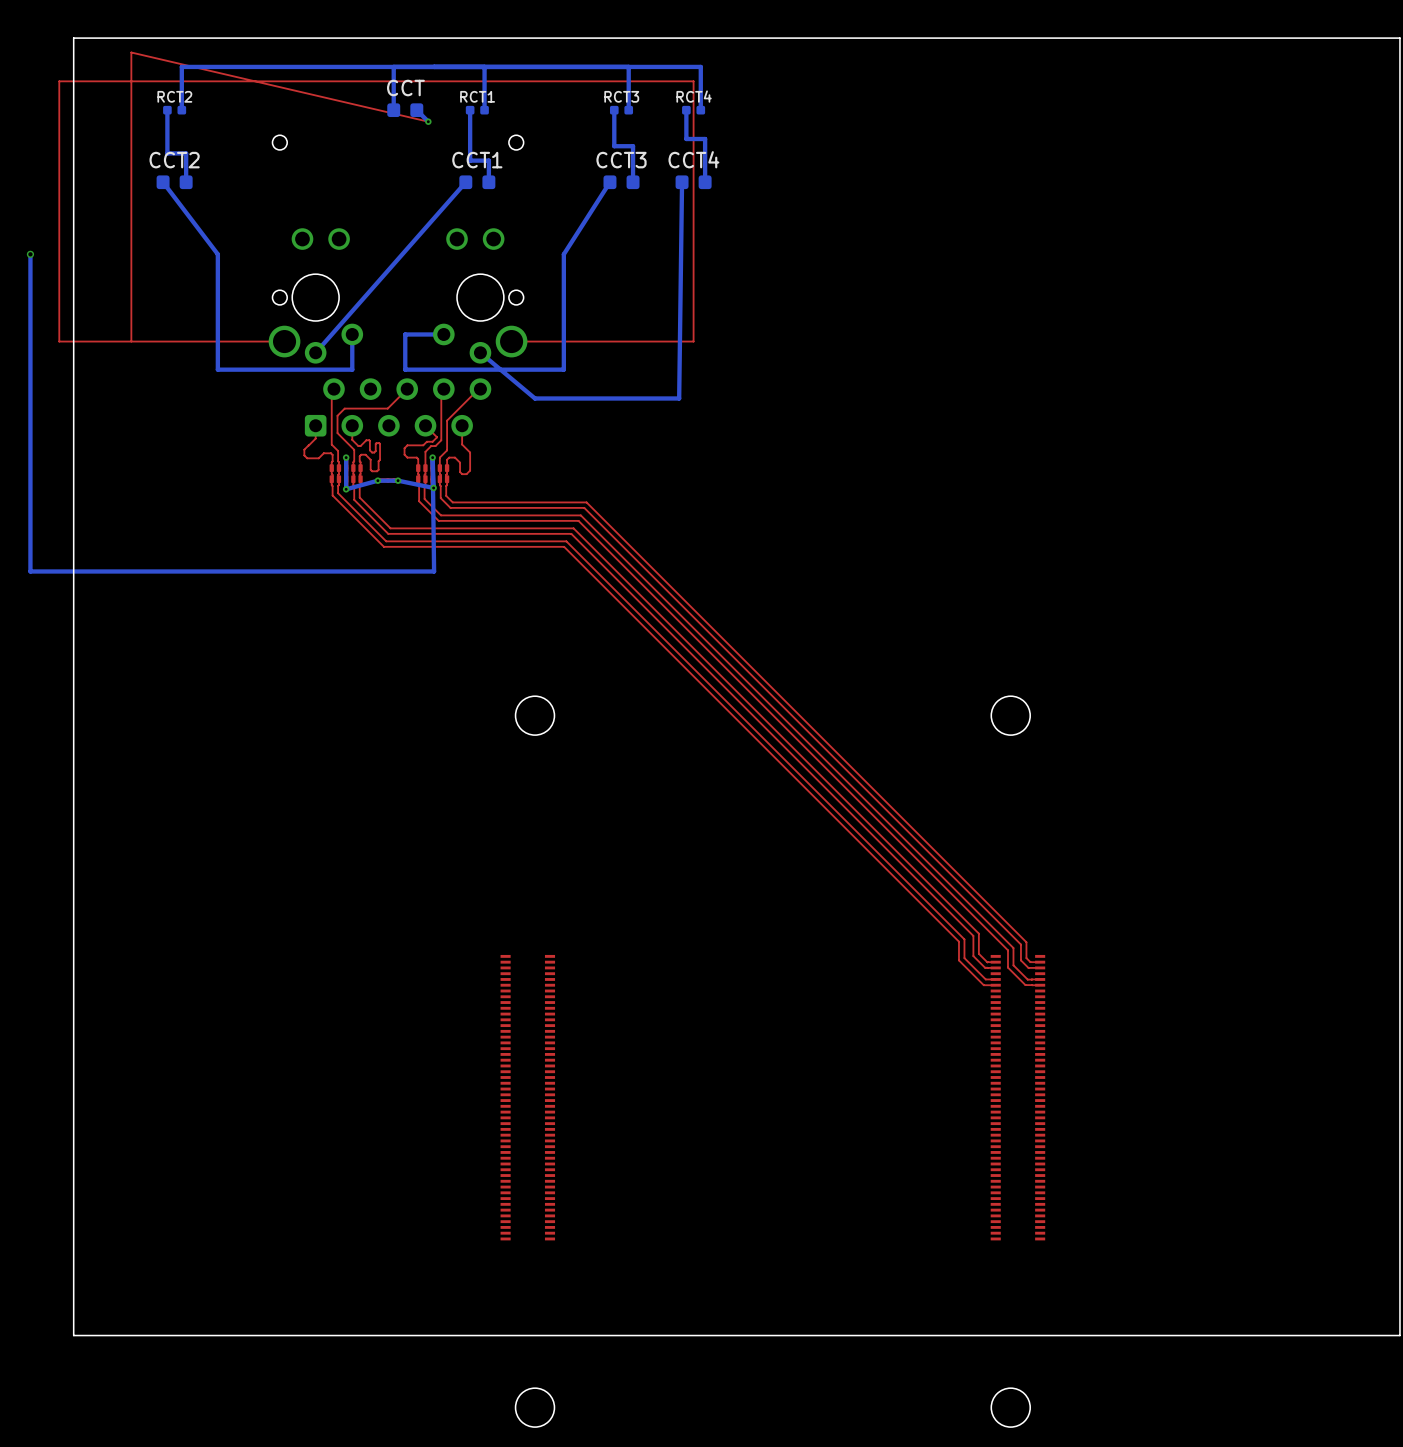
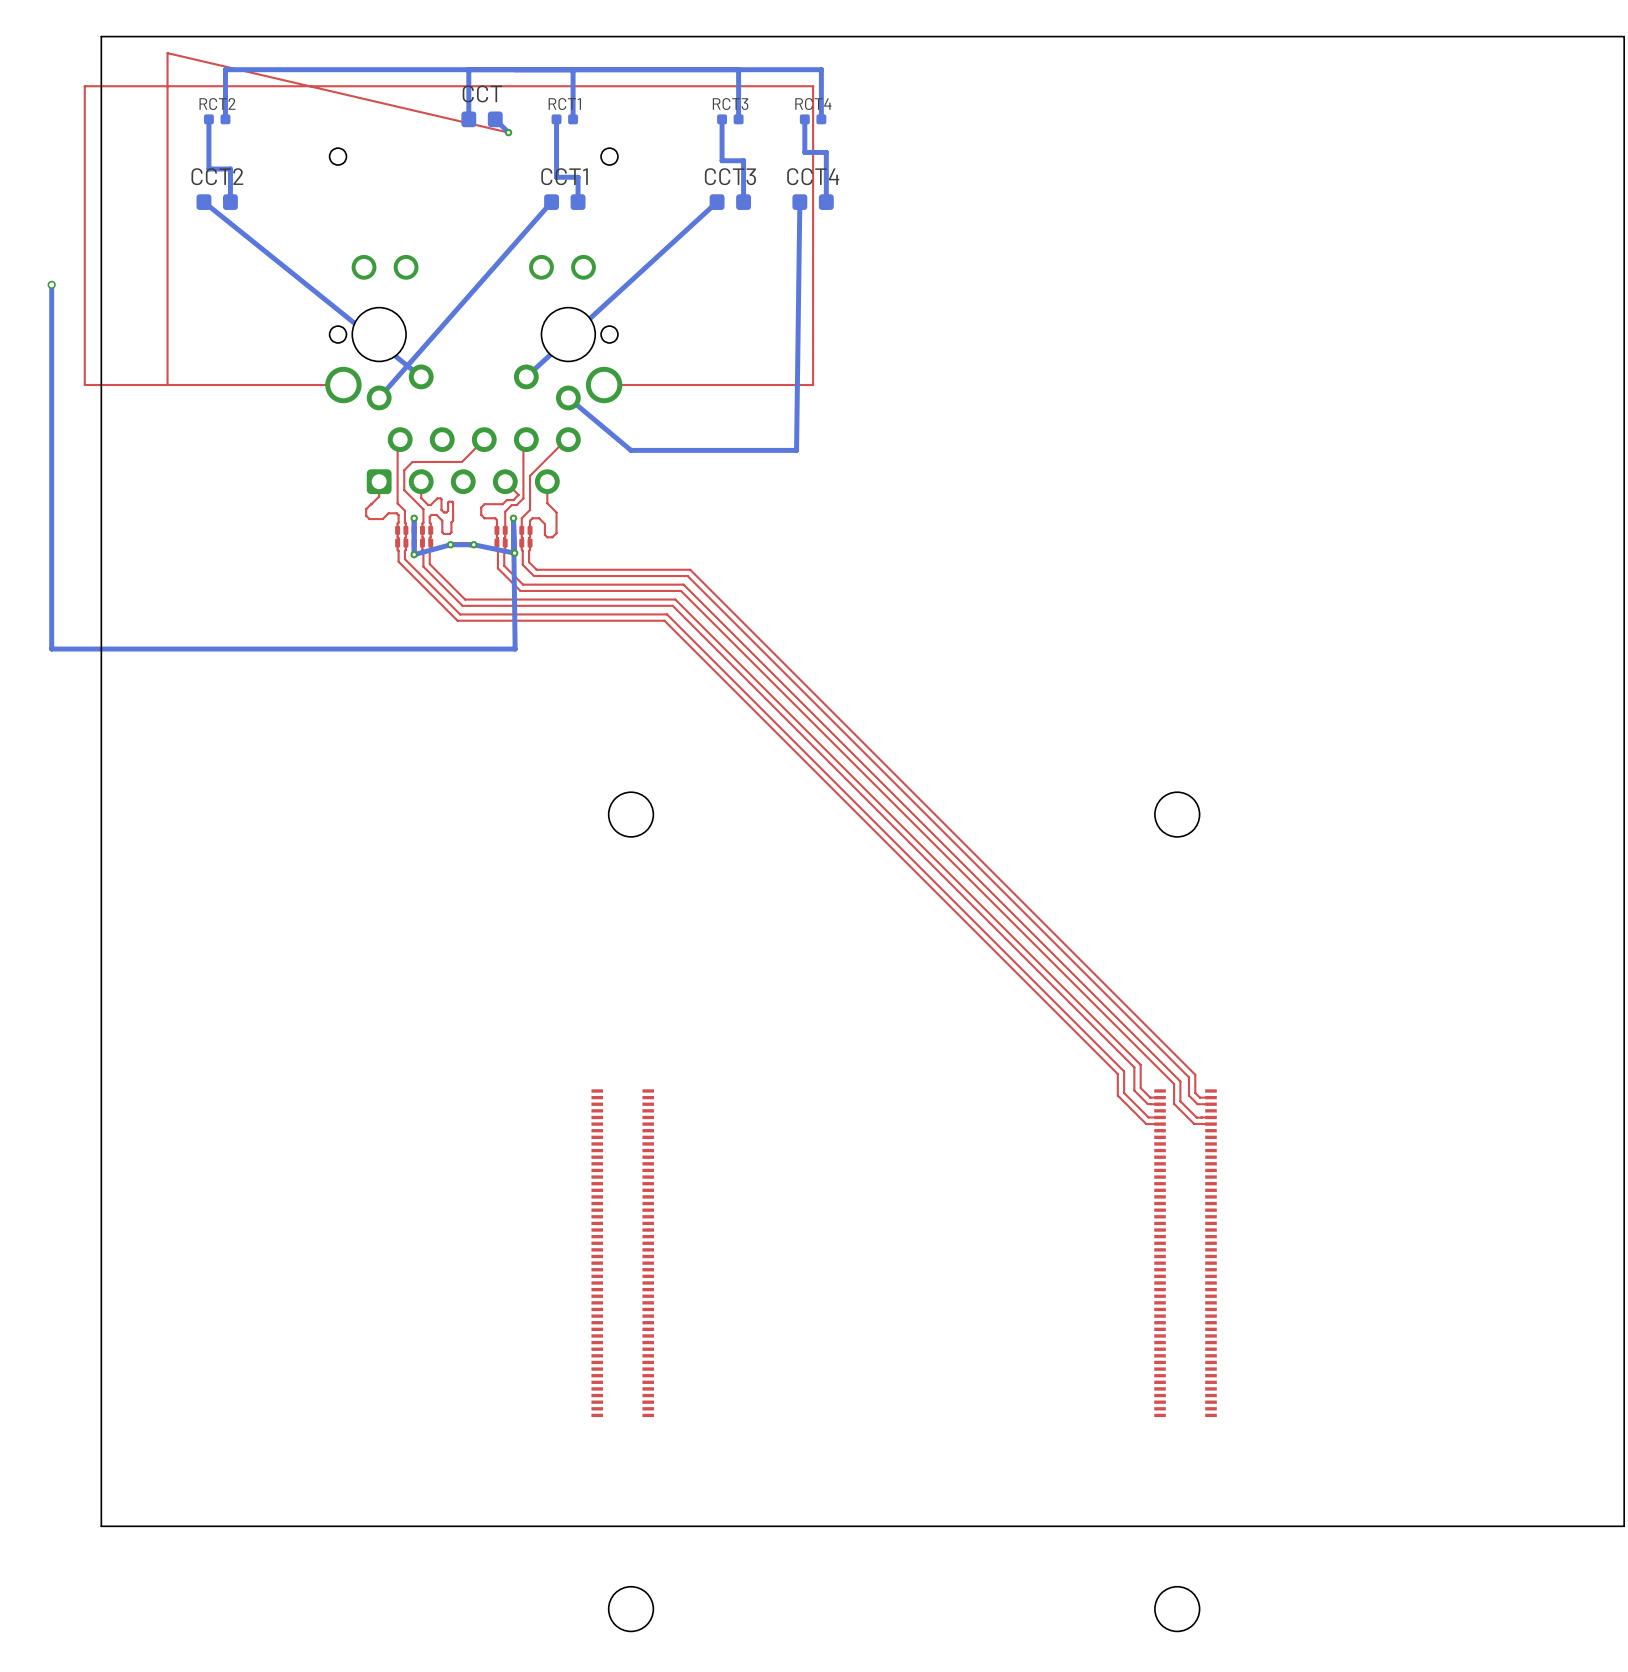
bottom track: (163, 182) (217, 254) (217, 369) (352, 369) (352, 334) -> (203, 202) (421, 376)
bottom track: (609, 182) (563, 254) (563, 369) (405, 369) (405, 334) (443, 334) -> (717, 202) (526, 376)

